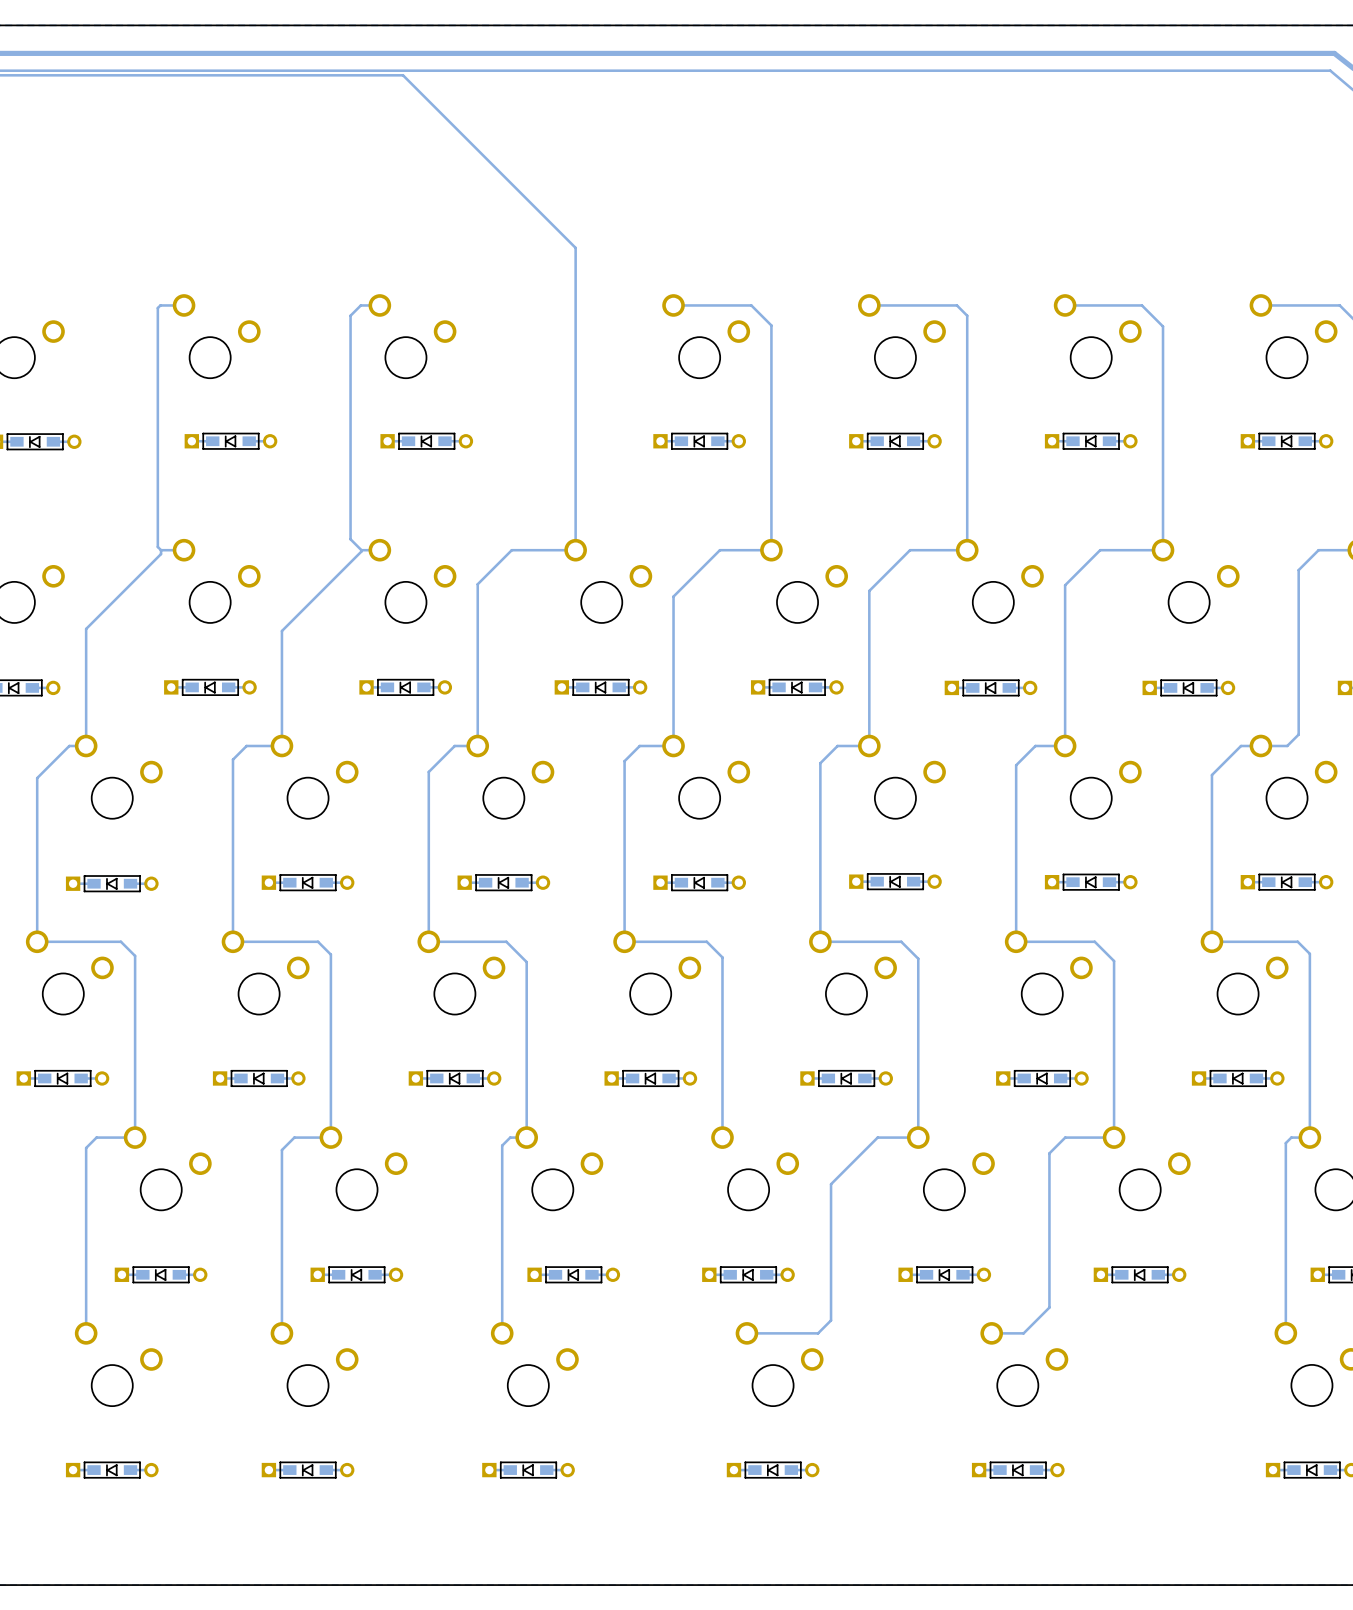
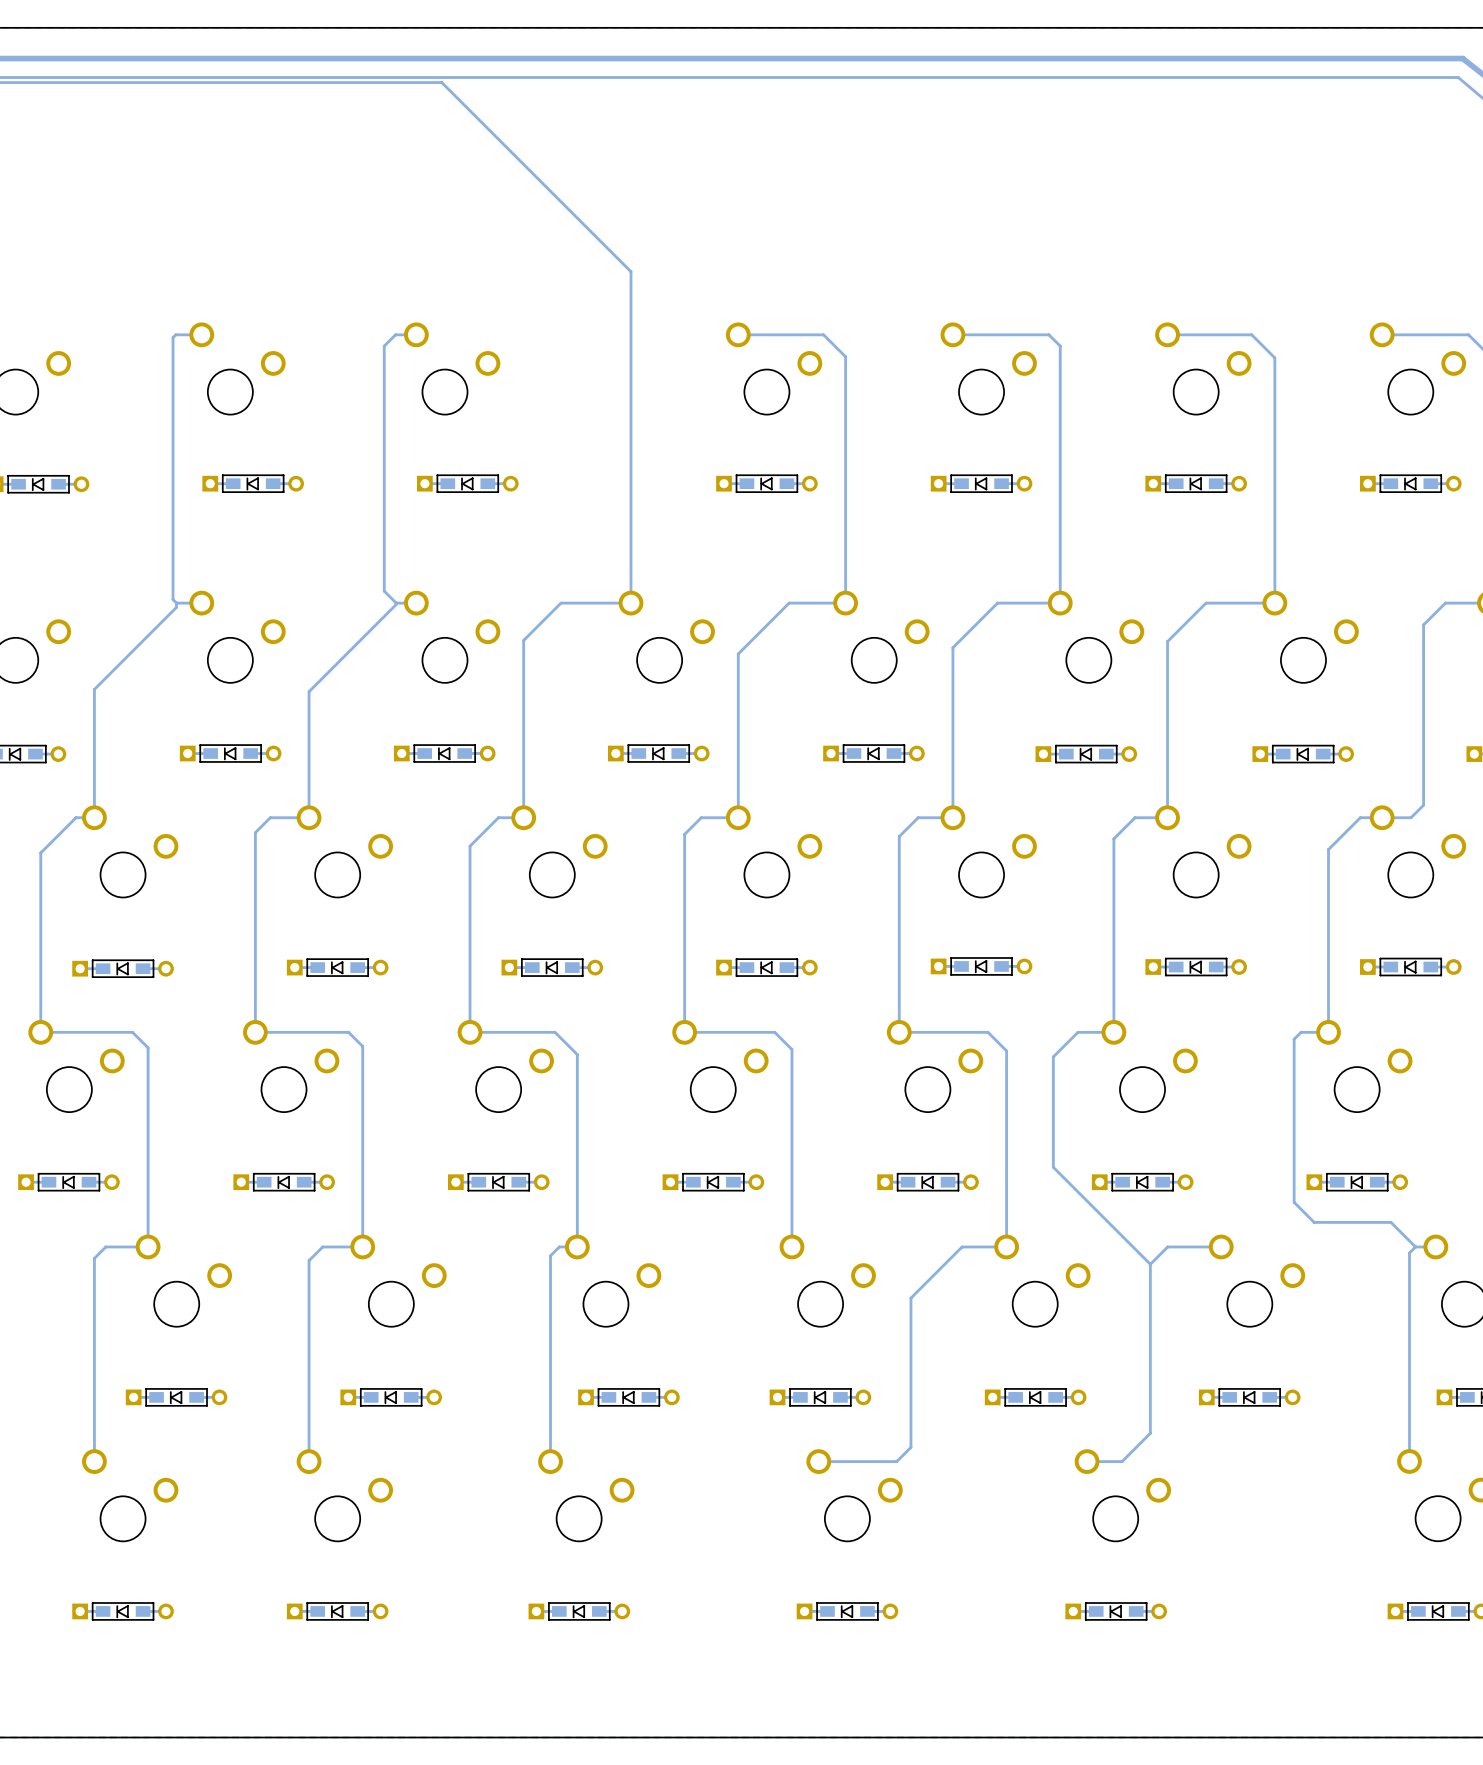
track: (1016, 941) (1094, 941) (1114, 961) (1114, 1137) -> (1113, 1032) (1077, 1032) (1053, 1056) (1053, 1167) (1150, 1264)
track: (1211, 941) (1297, 941) (1309, 953) (1309, 1137) -> (1328, 1032) (1301, 1032) (1294, 1039) (1294, 1202) (1314, 1222) (1390, 1222) (1415, 1246)

